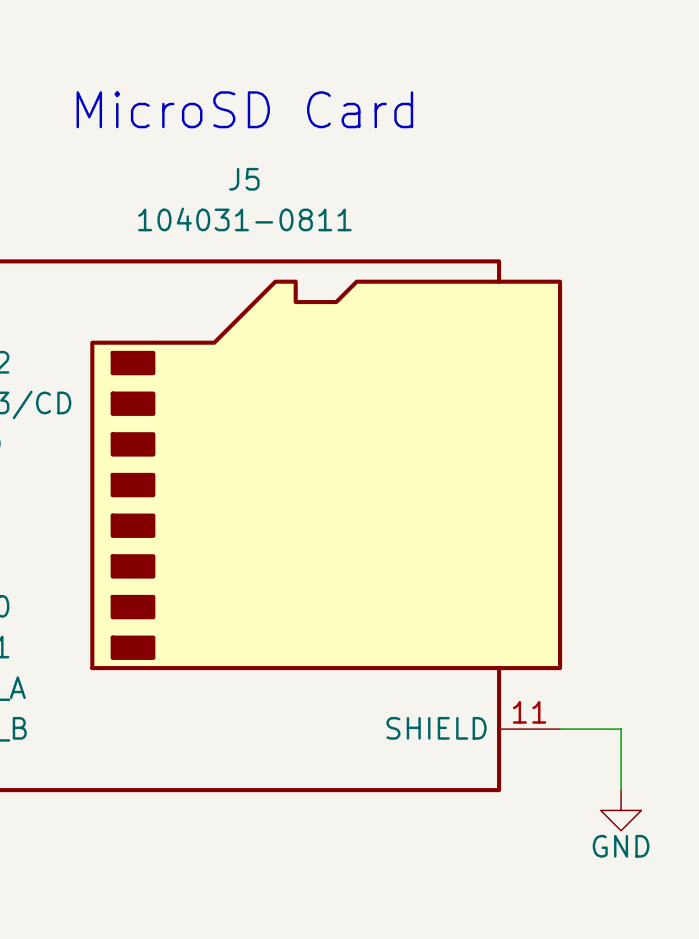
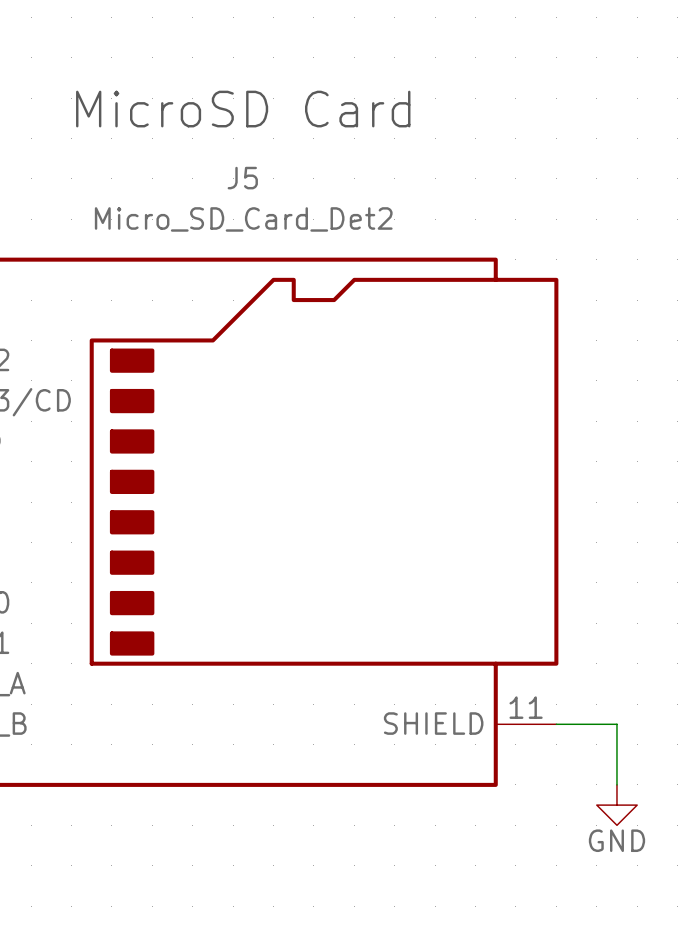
J5 value: 104031-0811 (244, 219) -> Micro_SD_Card_Det2 (243, 219)

